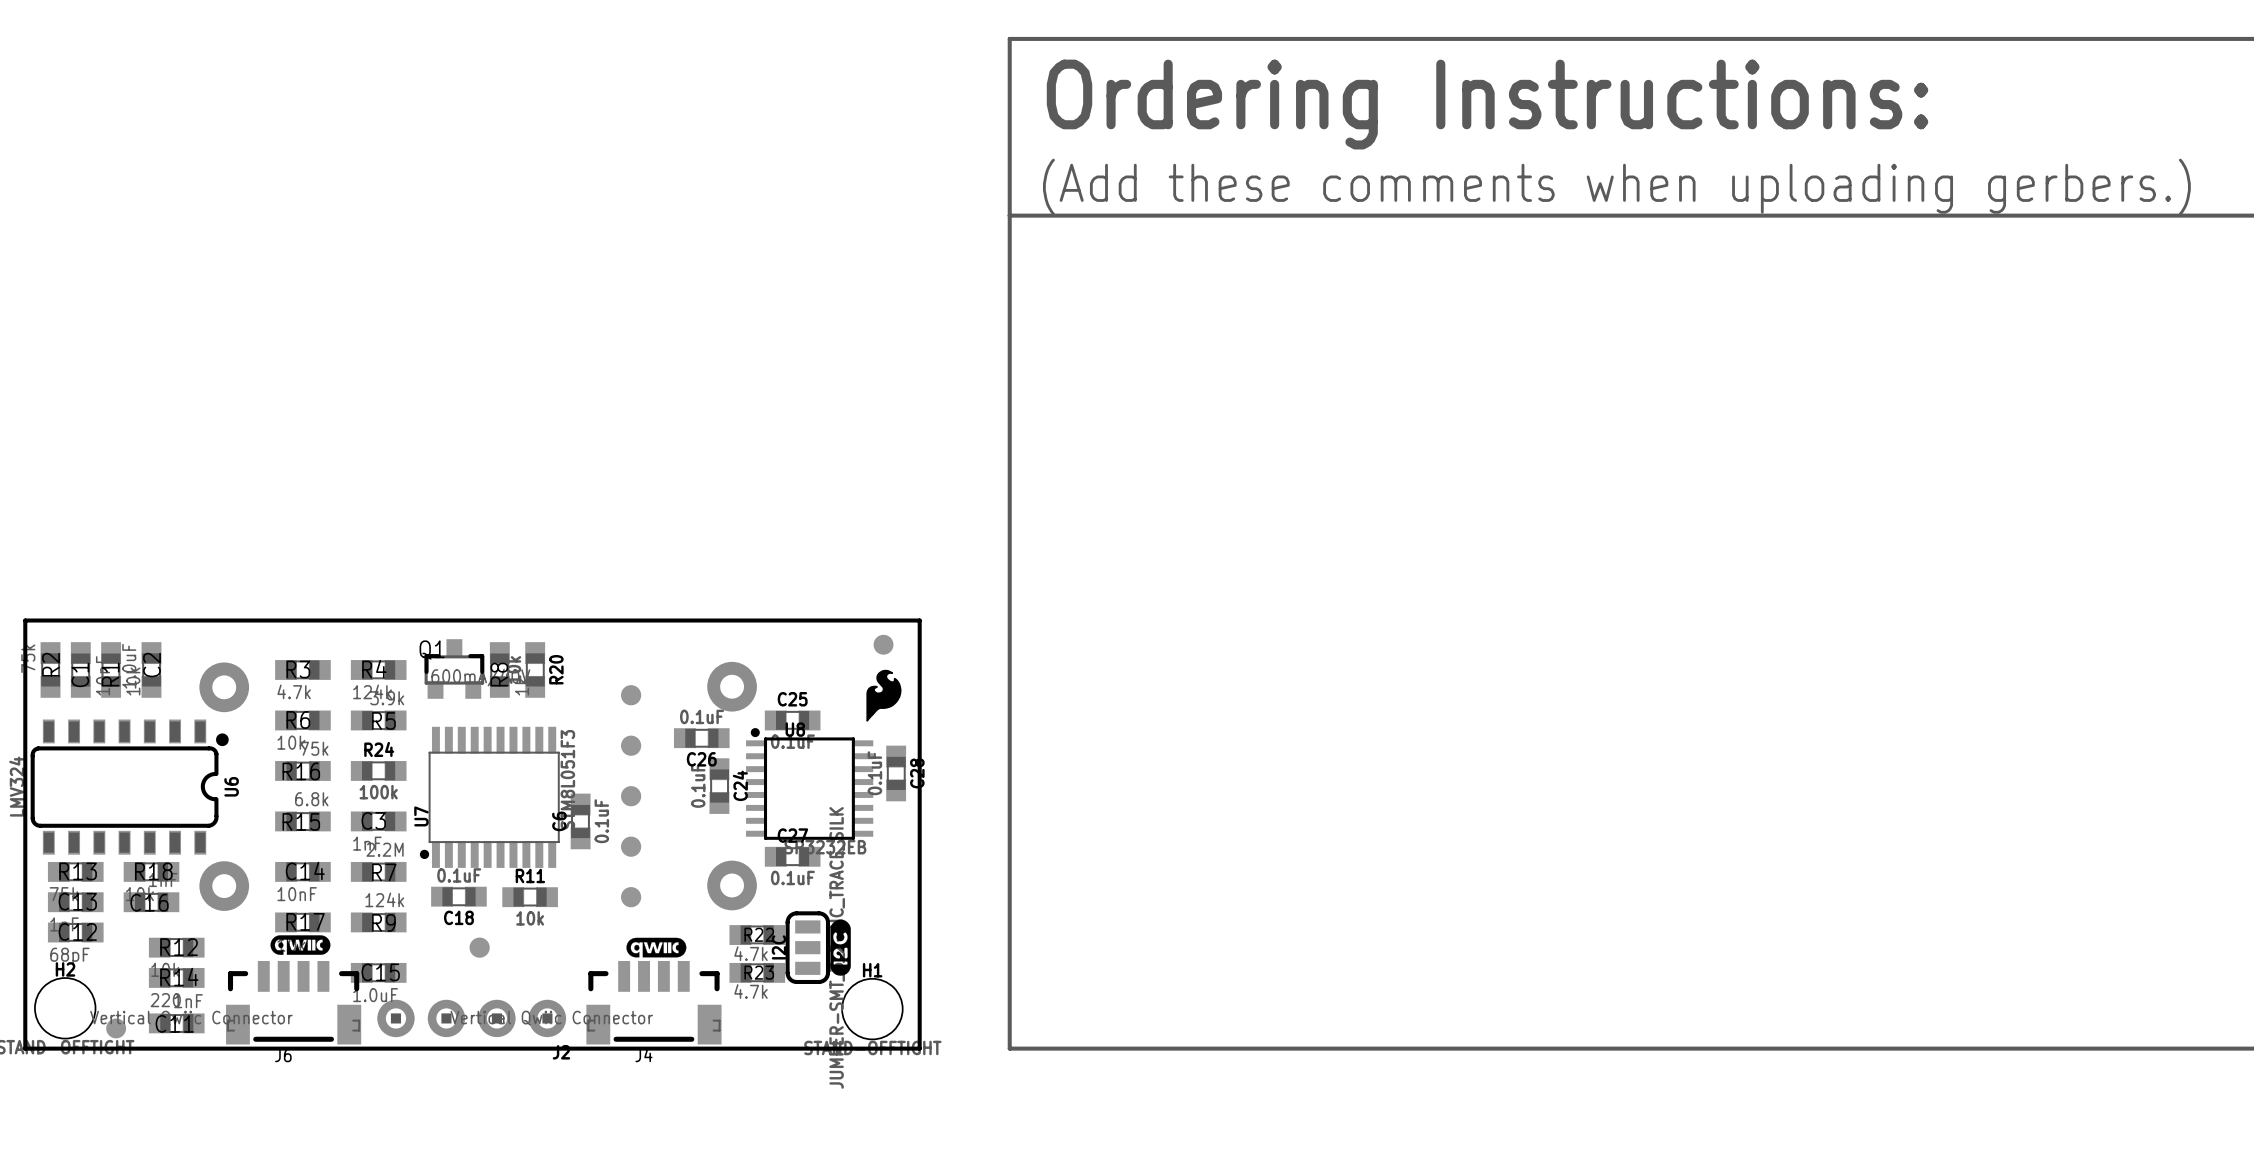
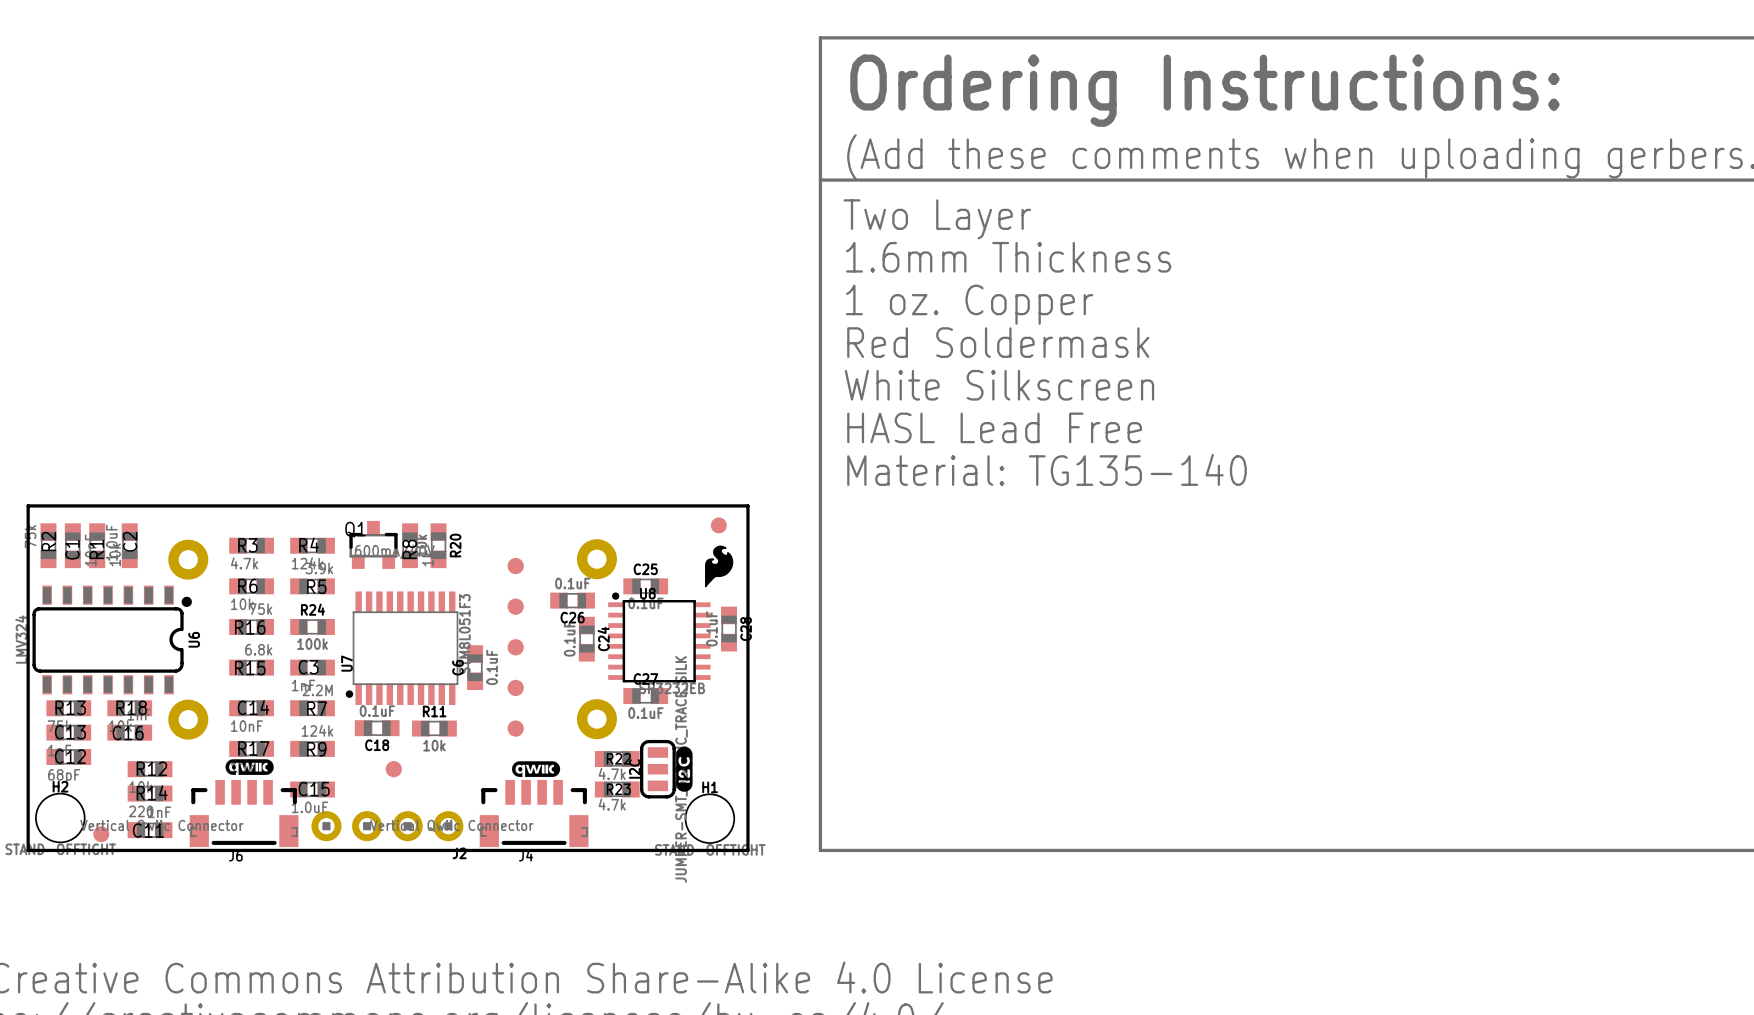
text: none -> Two Layer (937, 219)
text: none -> 1.6mm Thickness (1008, 257)
text: none -> 1 oz. Copper (969, 304)
text: none -> Red Soldermask (998, 342)
text: none -> White Silkscreen (999, 385)
text: none -> HASL Lead Free (994, 427)
text: none -> Material: TG135-140 (1047, 469)

